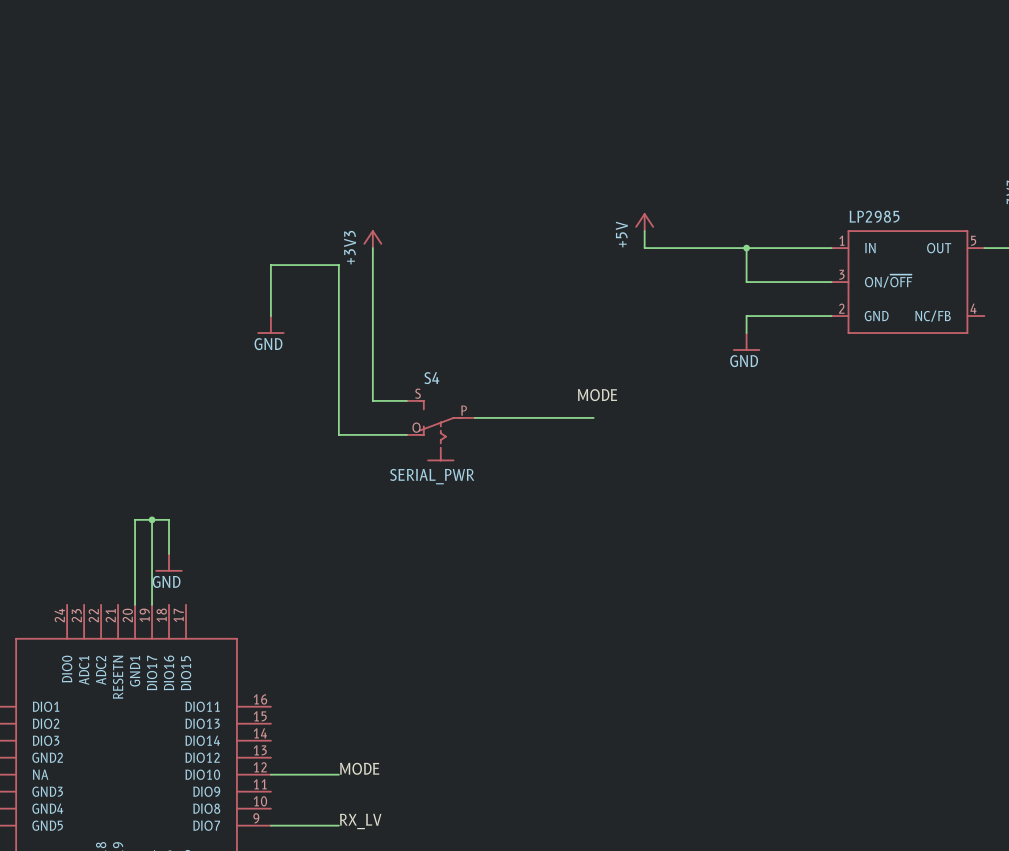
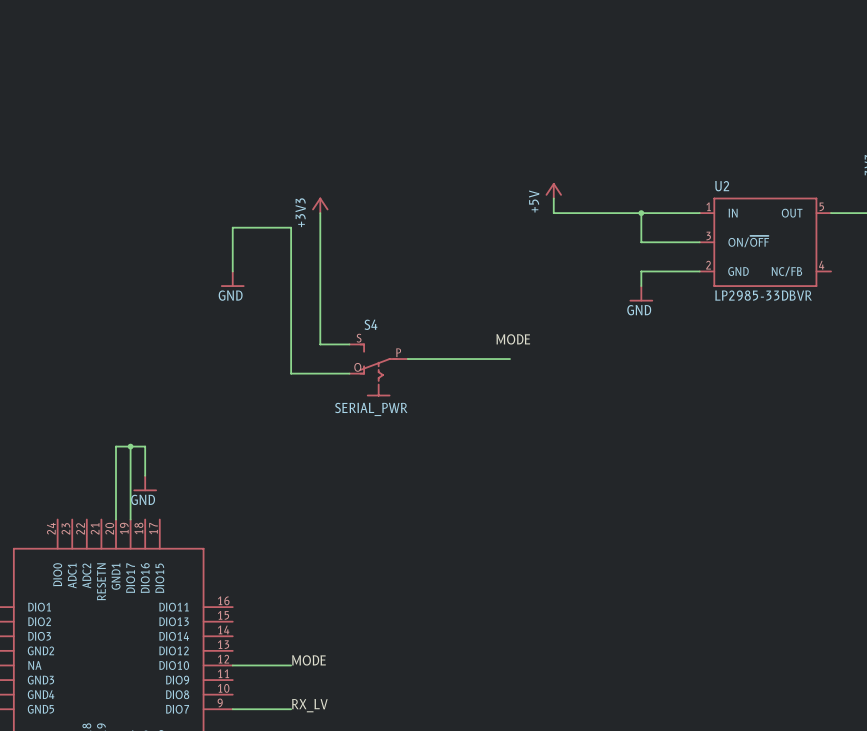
U2: none -> LP2985-33DBVR (765, 242)
LP2985: (907, 282) -> none

